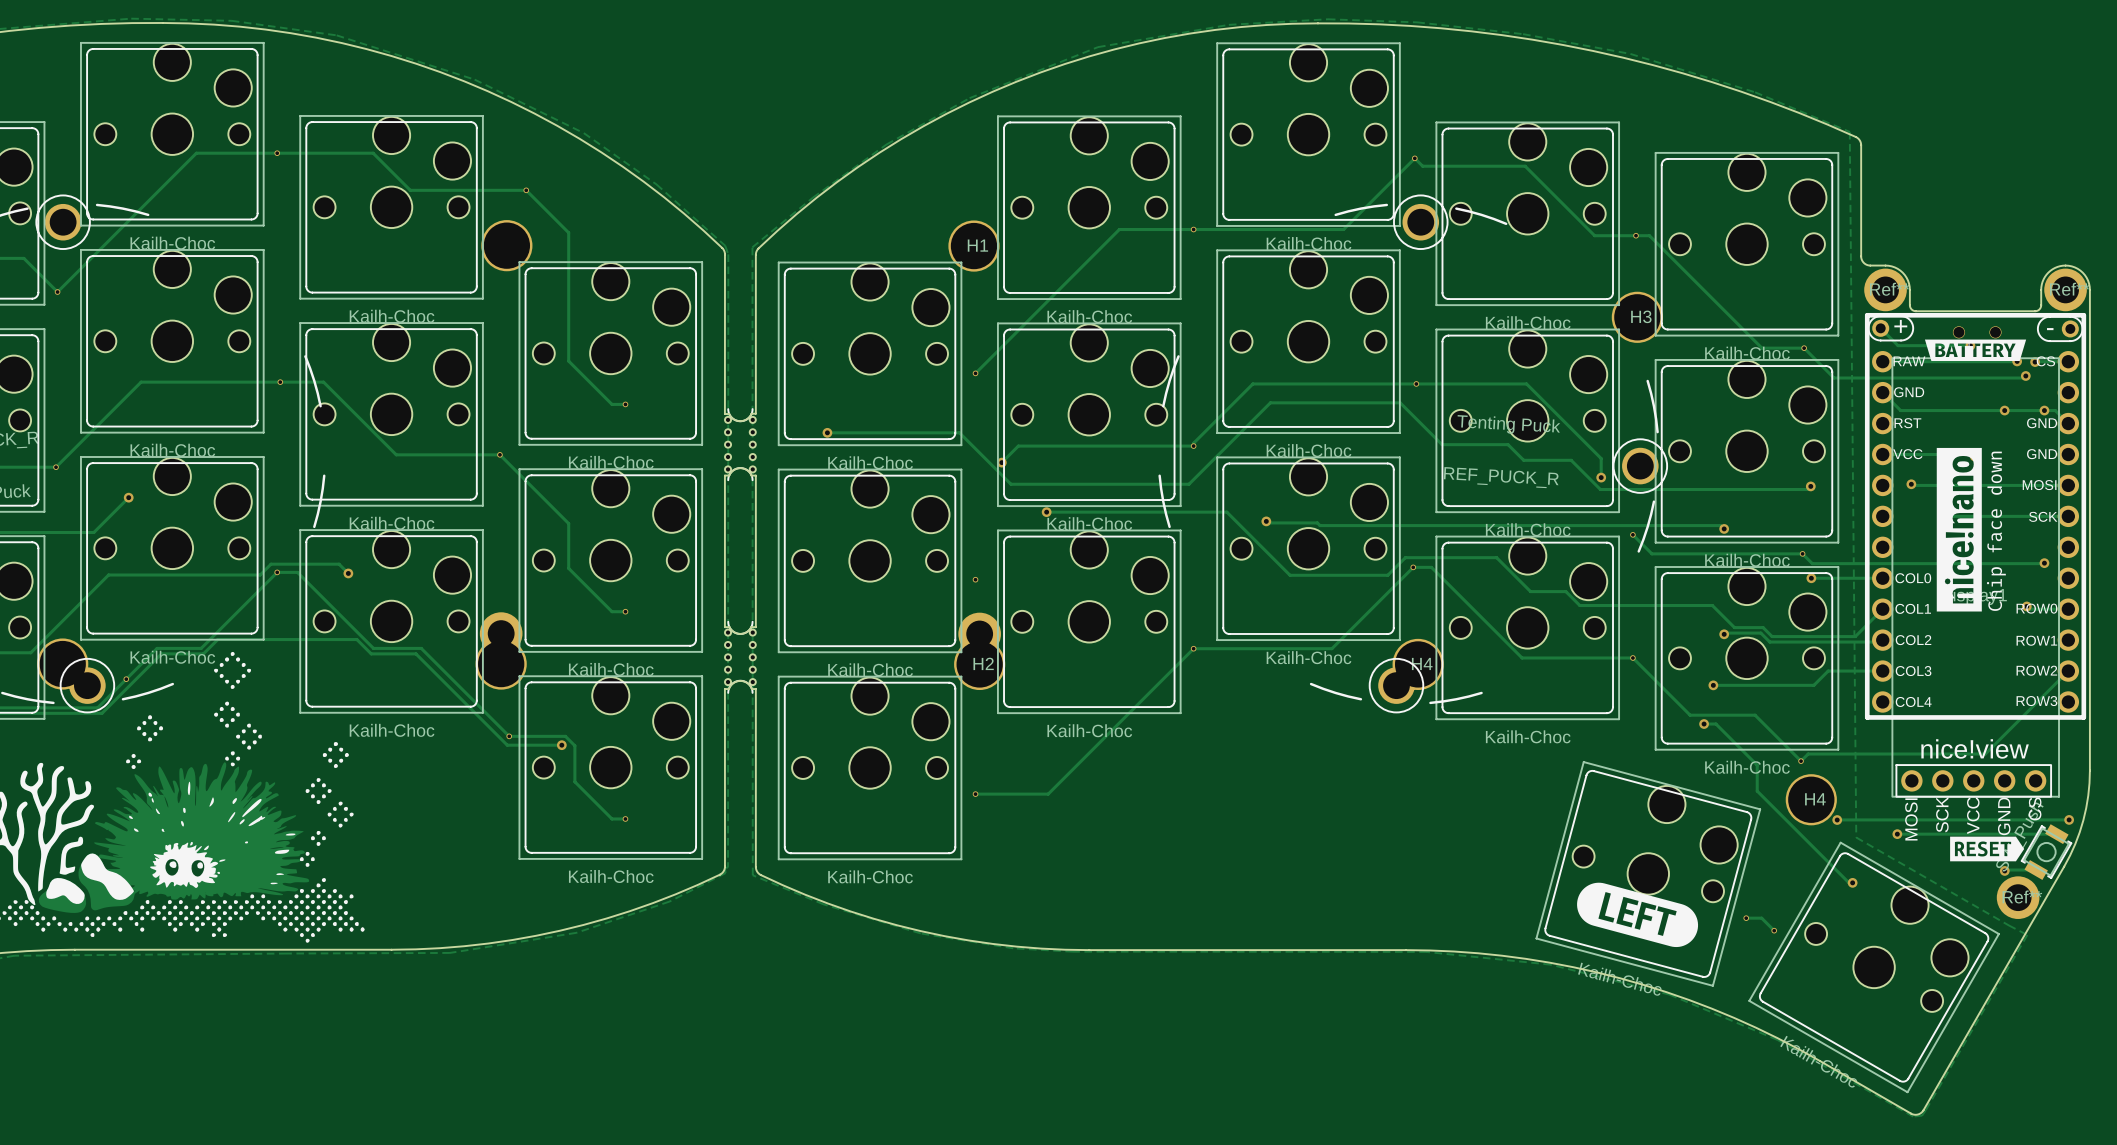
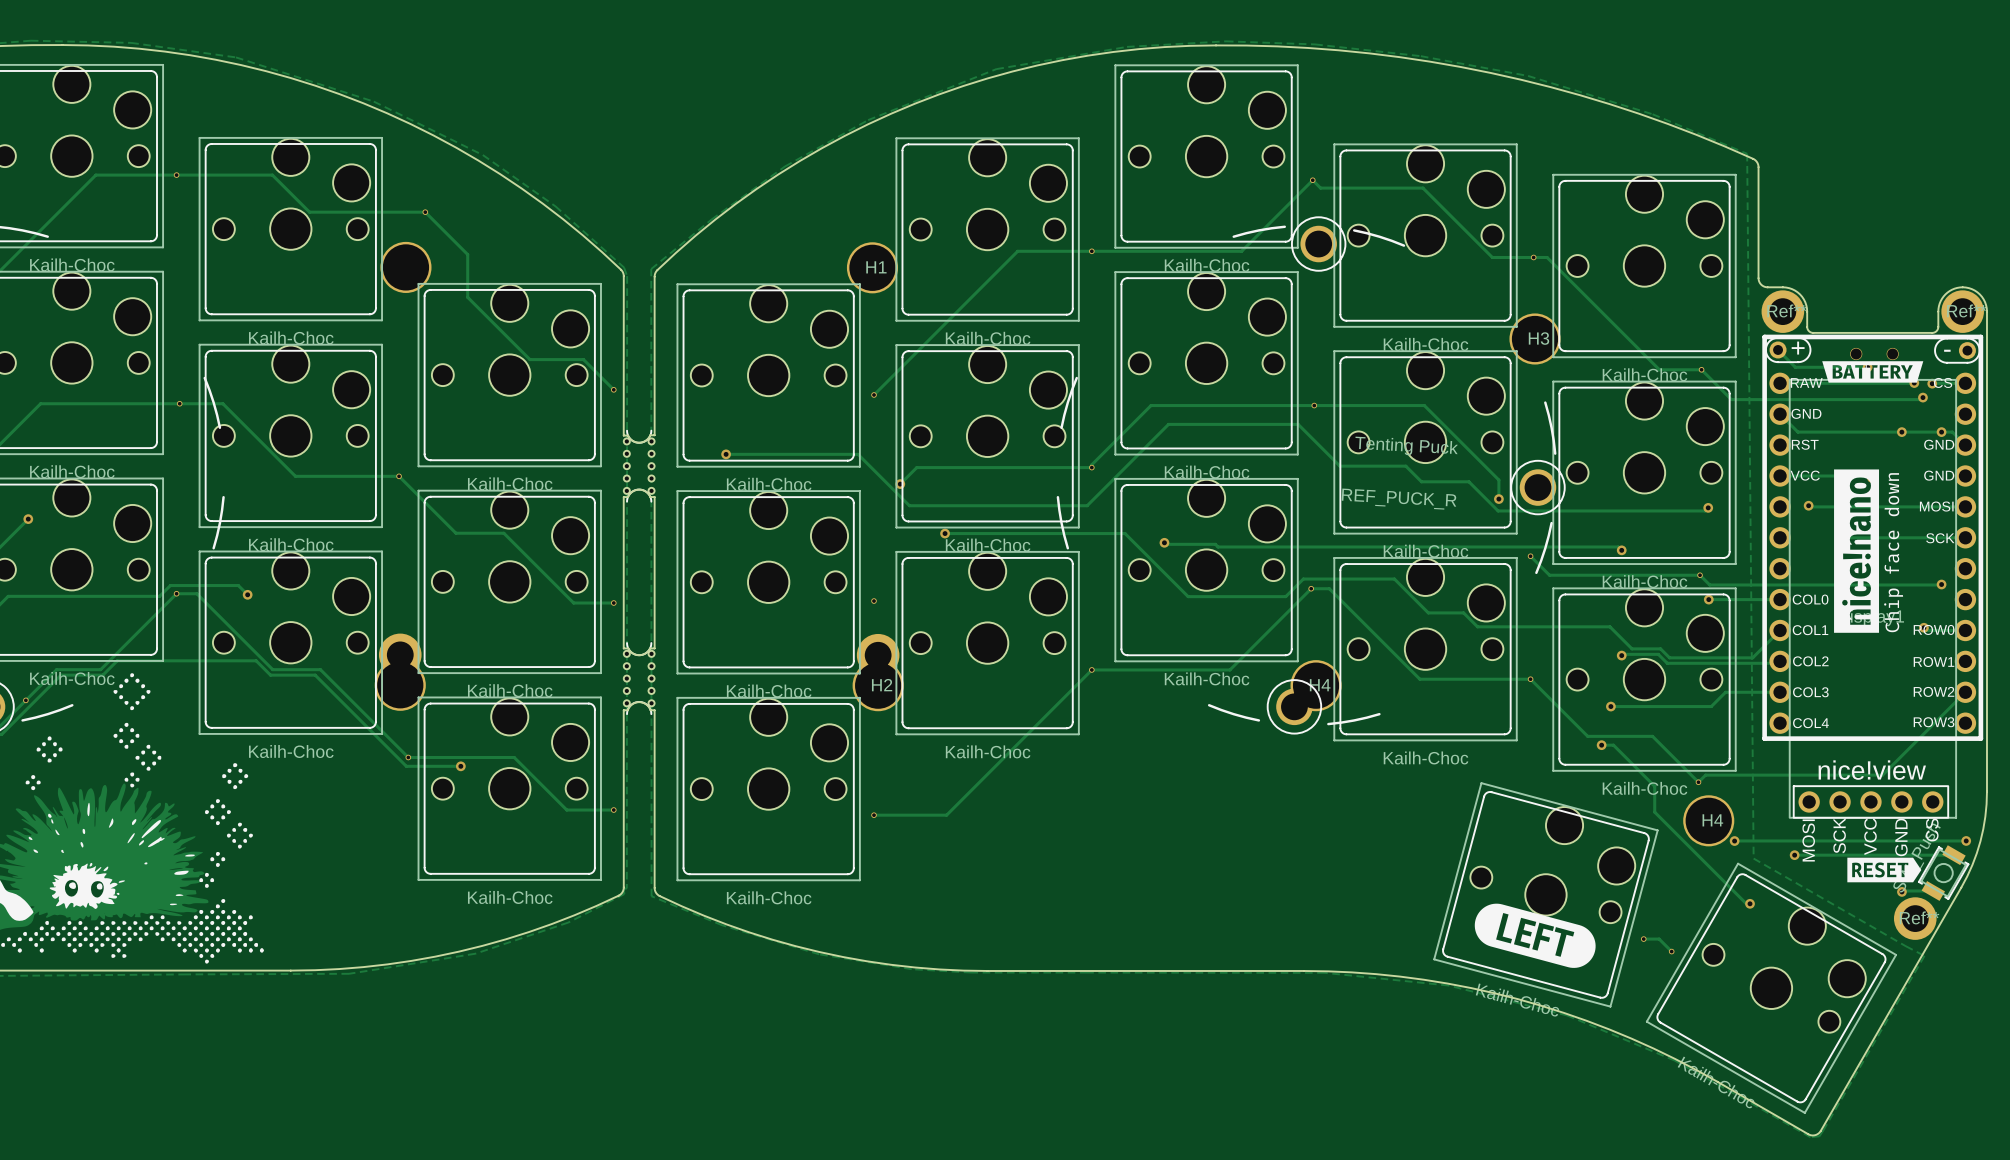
track: (568, 275) (568, 361) (612, 404) (625, 404) -> (467, 297) (529, 359) (583, 359) (613, 389)
part position: (625, 404) -> (613, 389)
track: (556, 511) (568, 523) (568, 568) (612, 611) (625, 611) -> (455, 533) (503, 533) (573, 603) (613, 603)
part position: (625, 611) -> (613, 603)
track: (565, 736) (574, 745) (574, 781) (612, 818) (625, 818) -> (464, 757) (514, 757) (566, 810) (613, 810)
part position: (625, 818) -> (613, 810)

